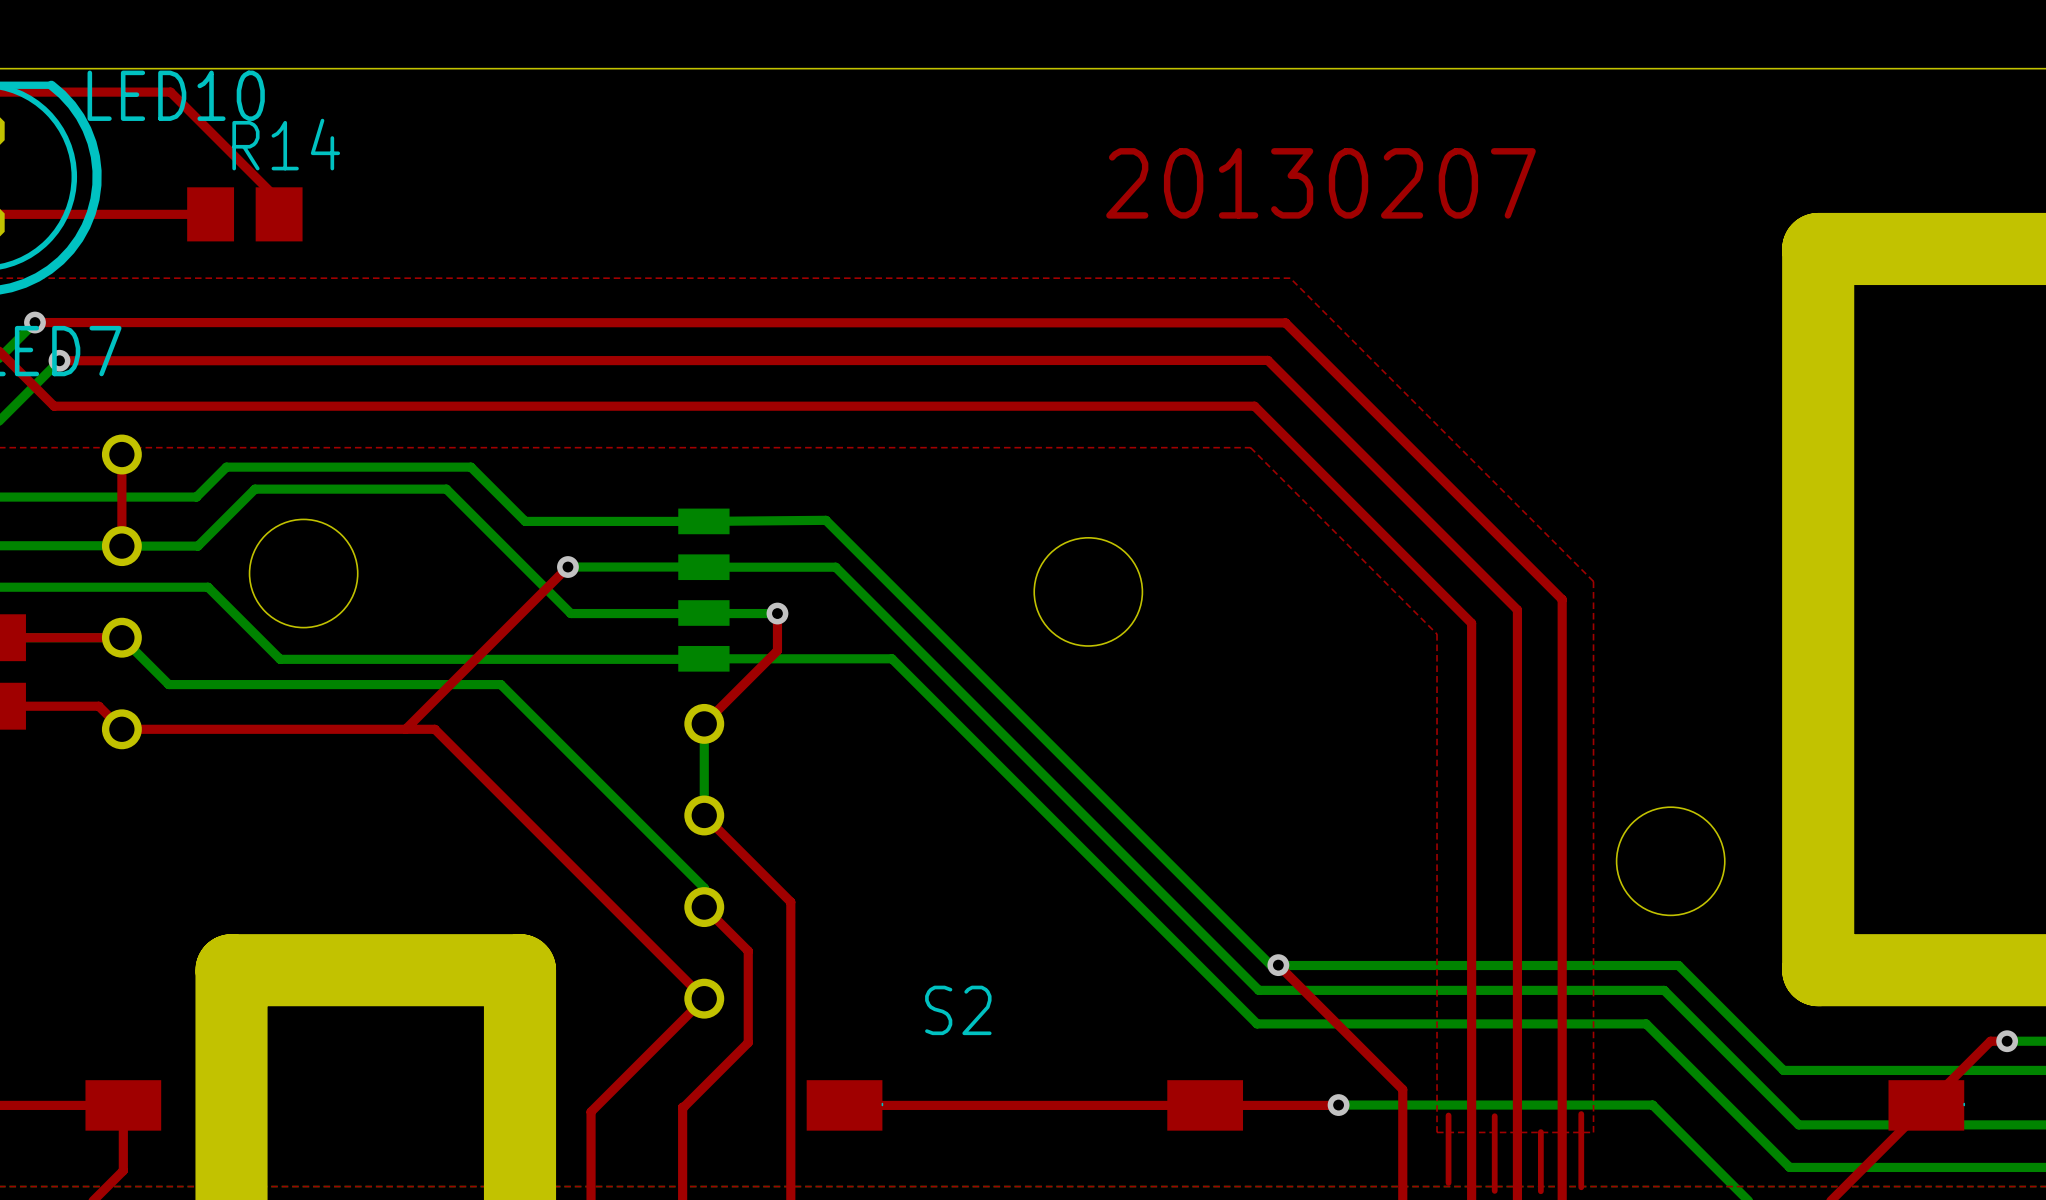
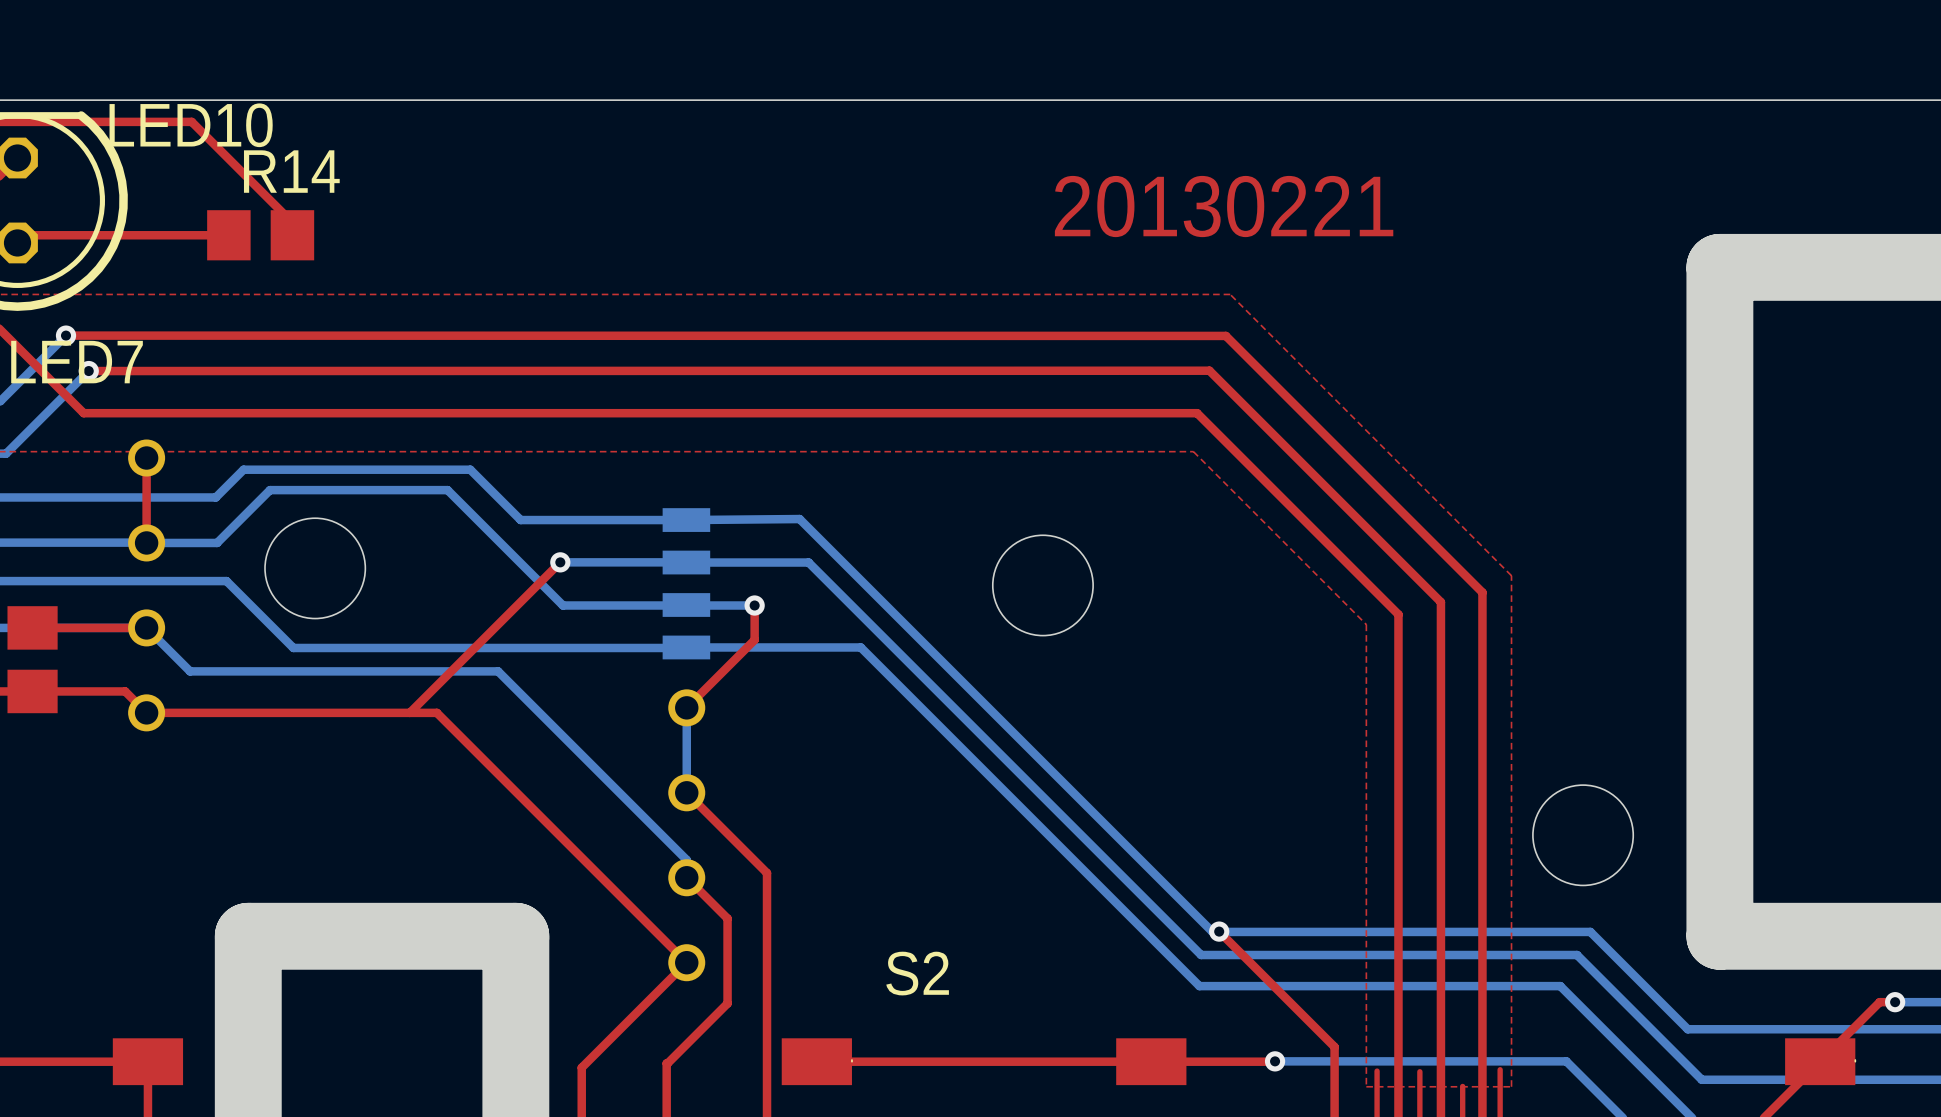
text: 20130207 (1321, 183) -> 20130221 (1224, 206)

